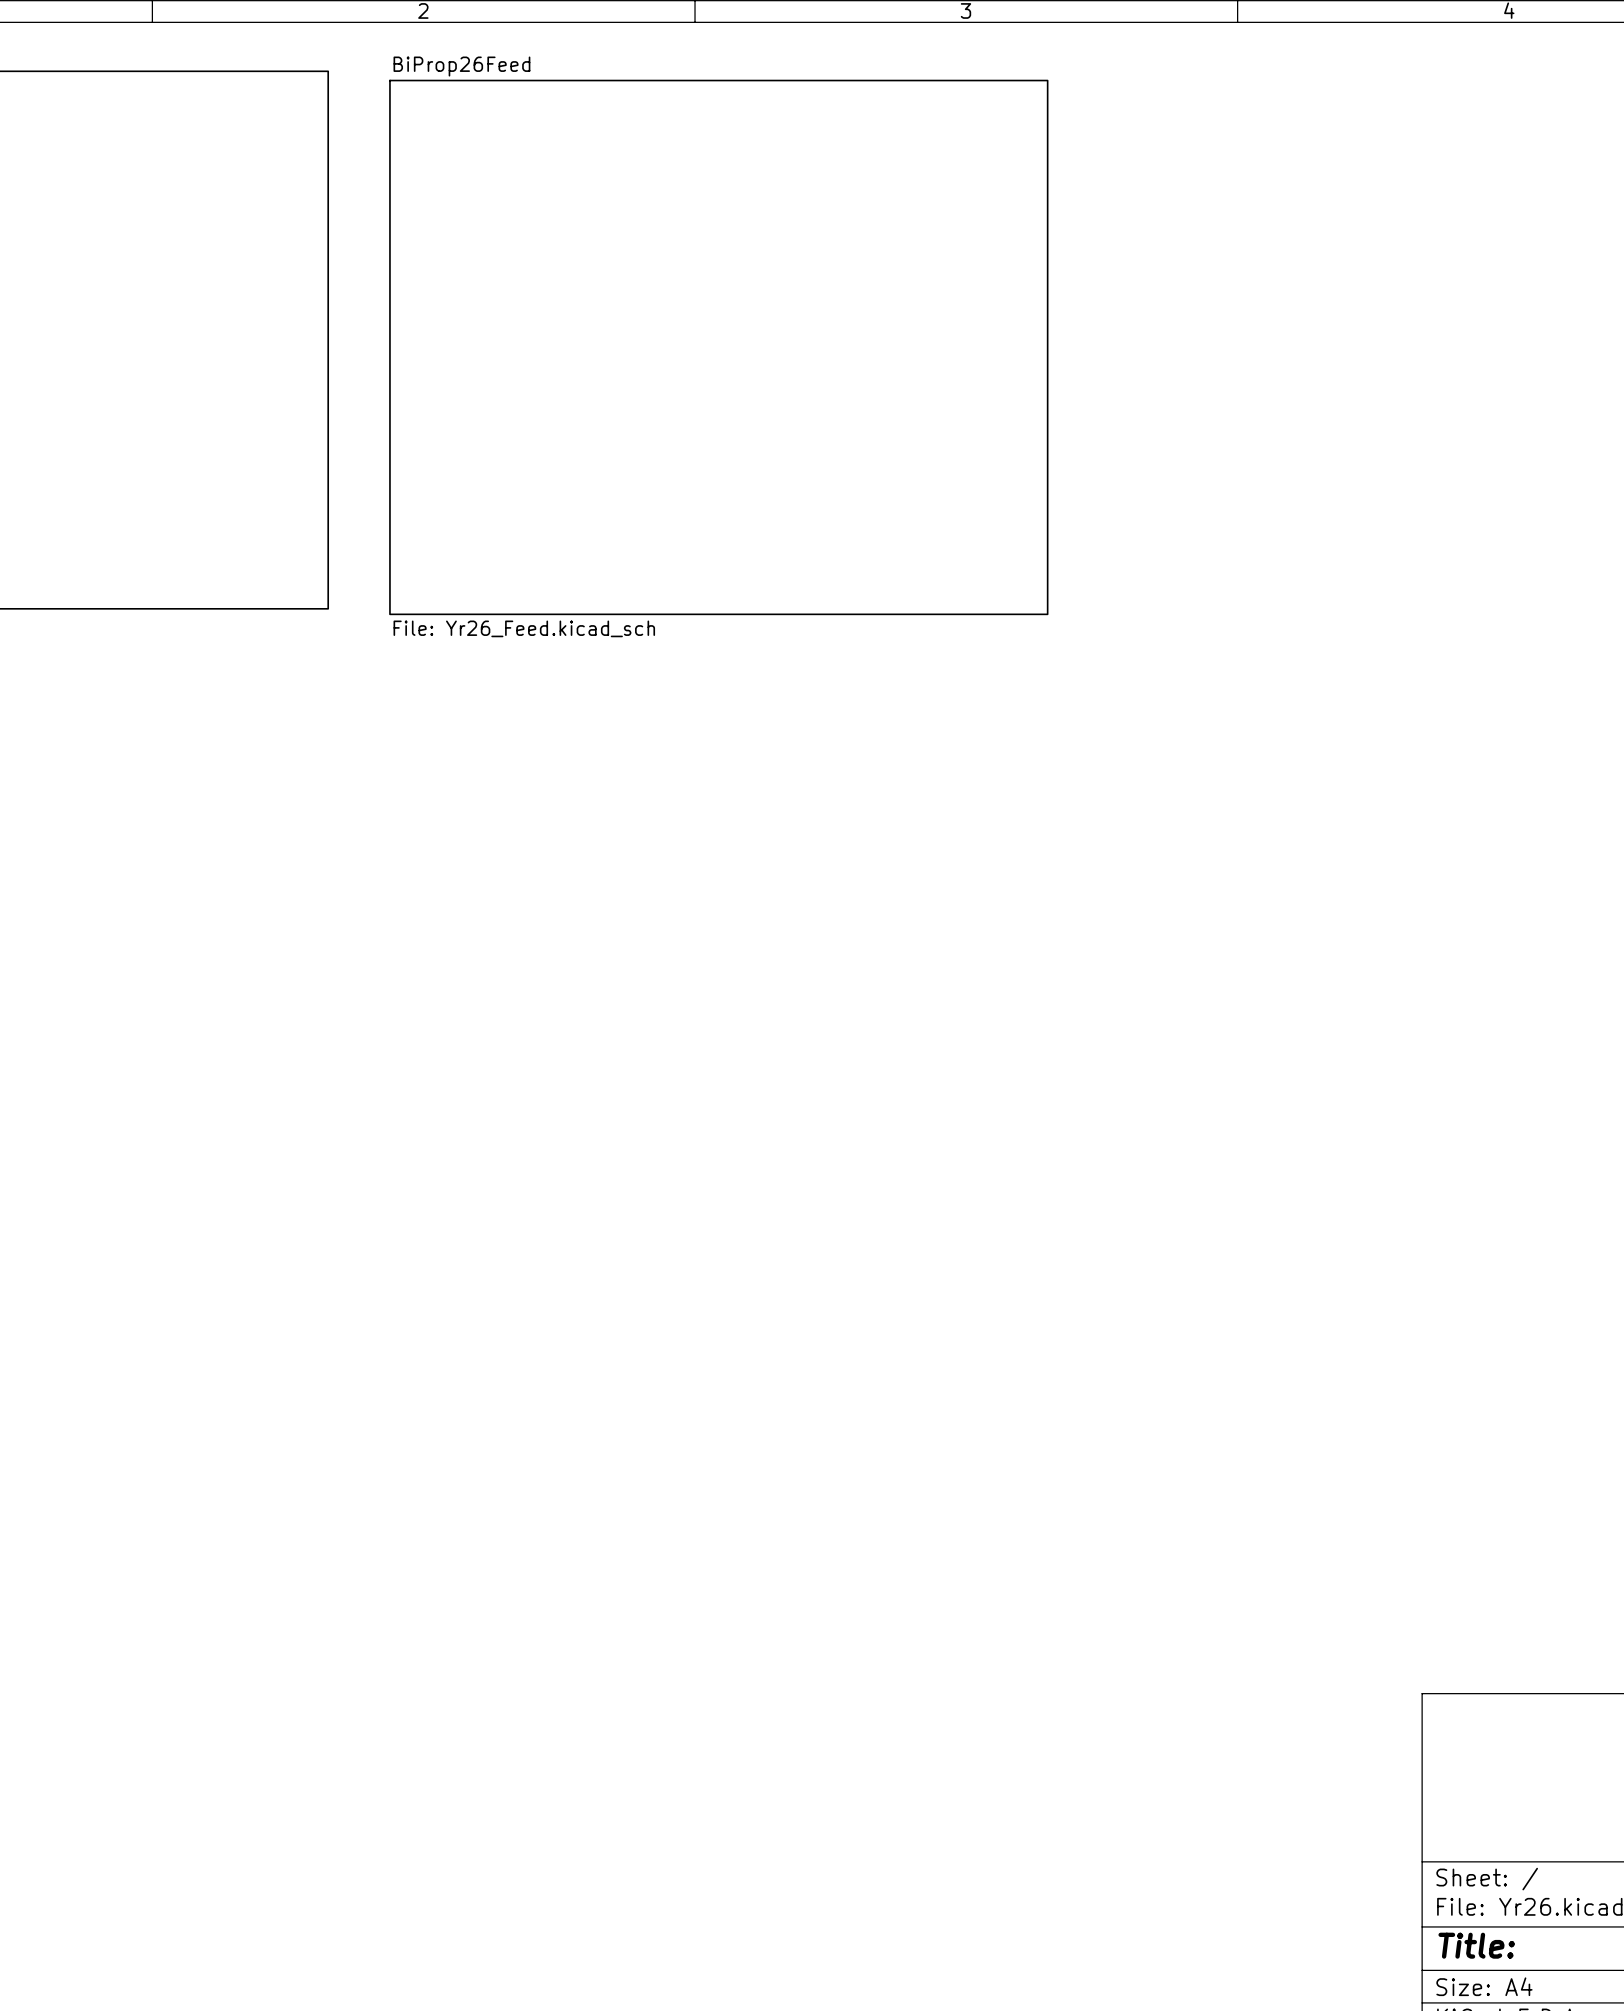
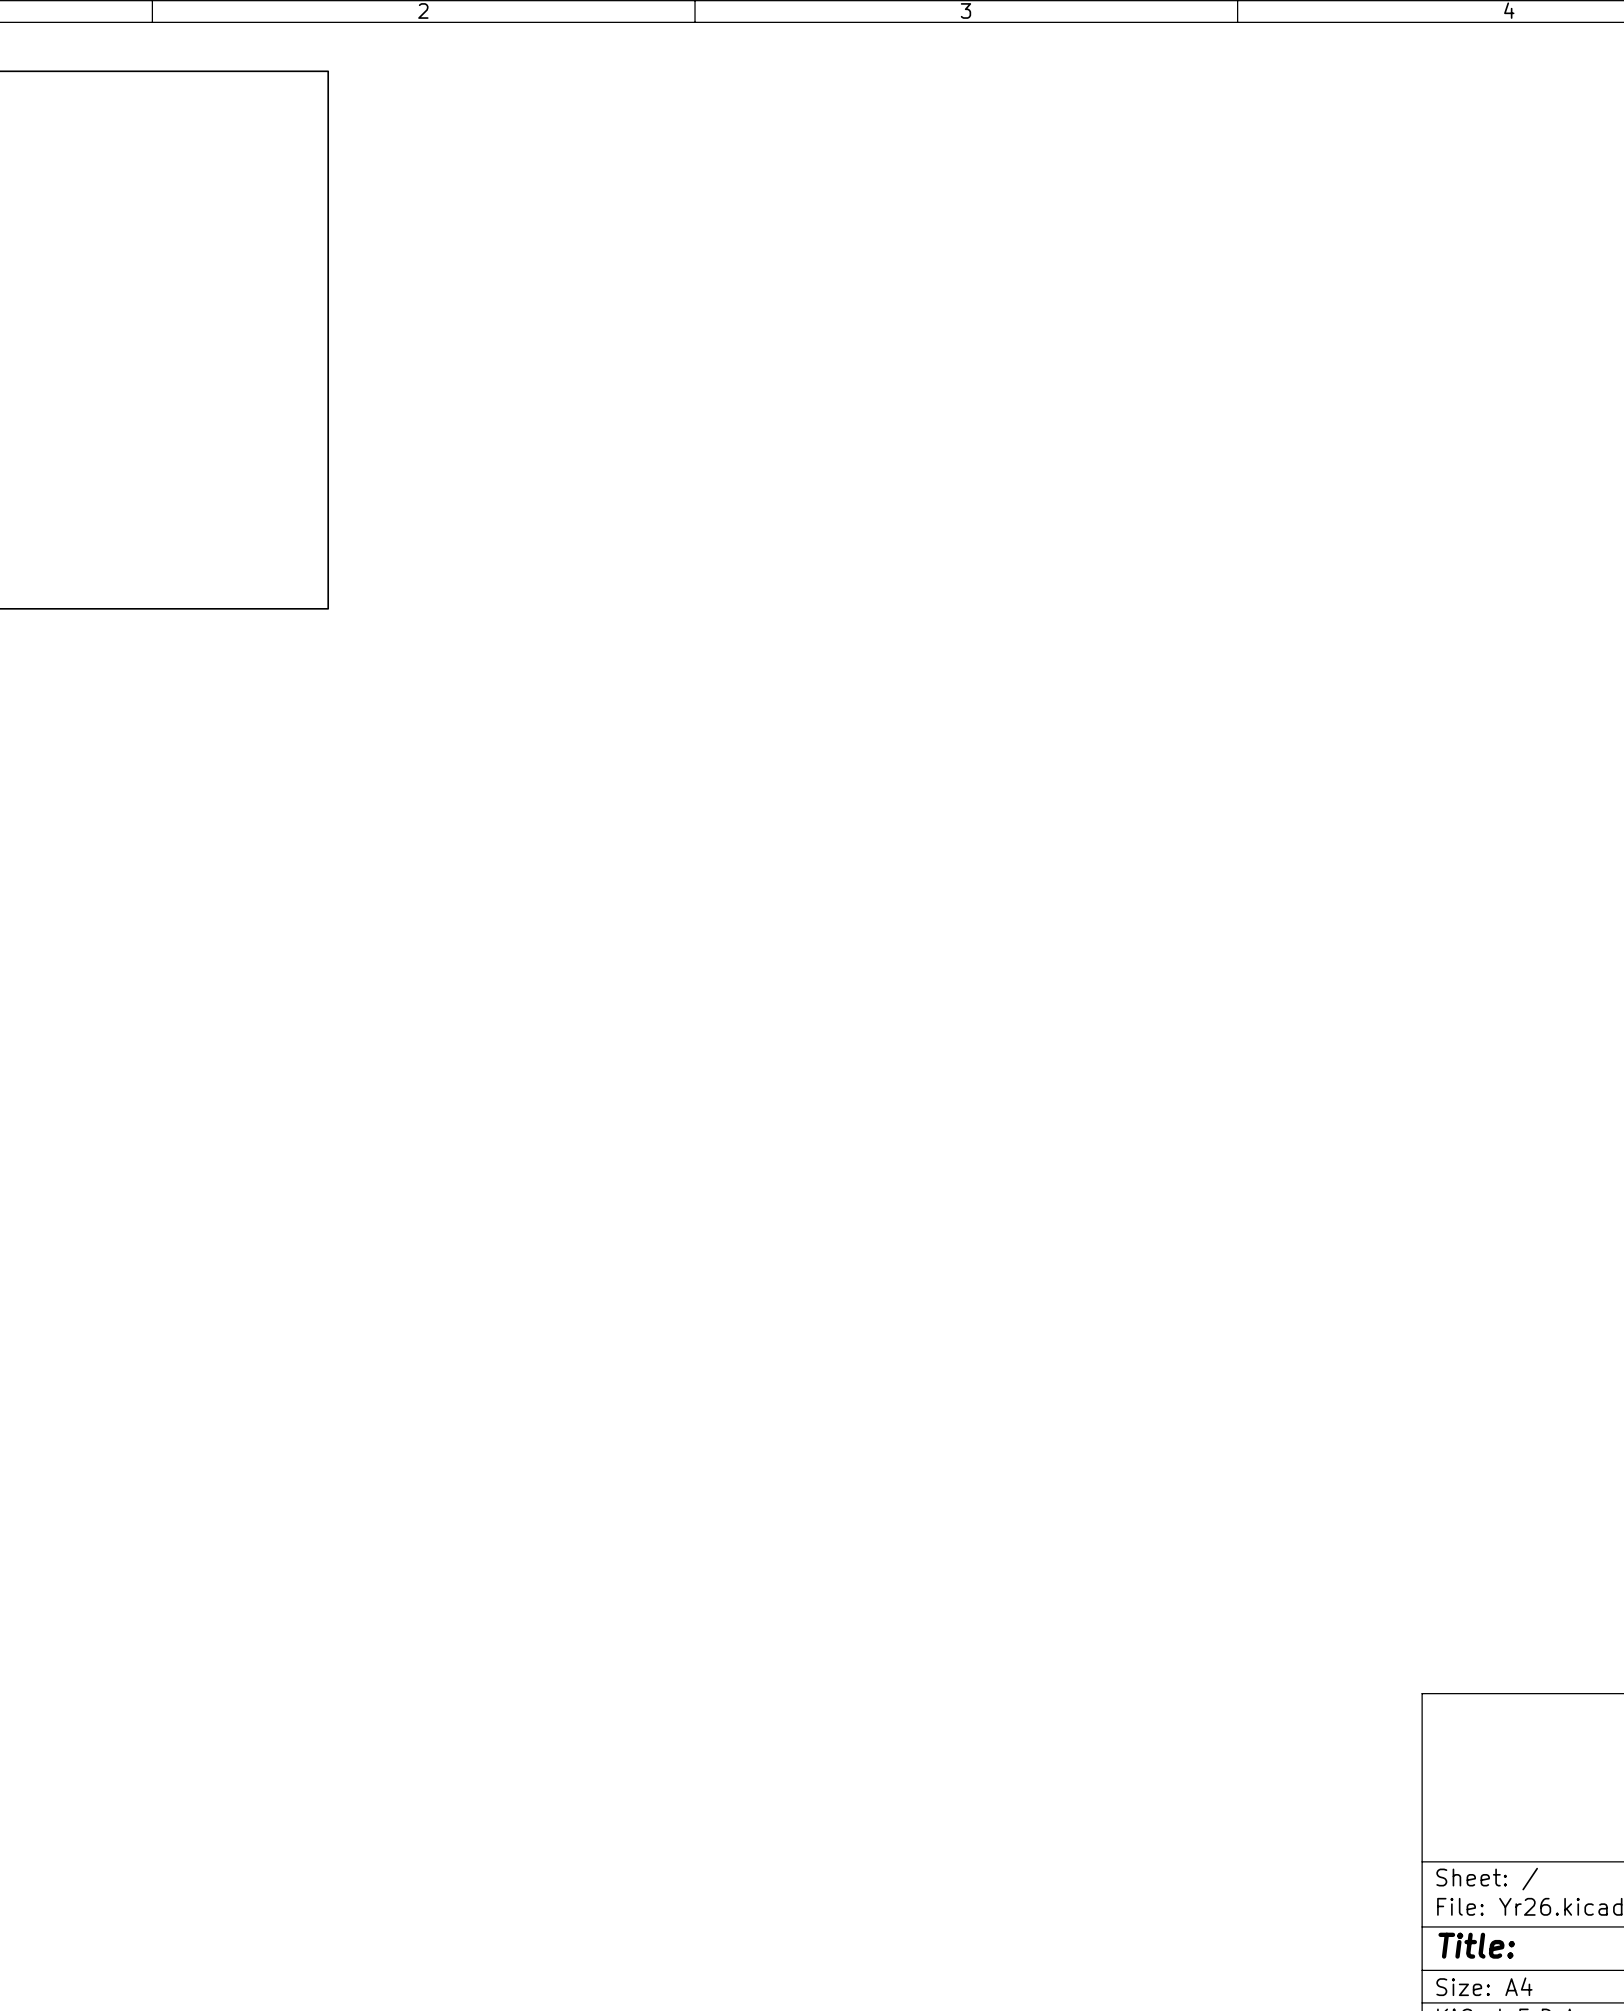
sheet BiProp26Feed: File: Yr26_Feed.kicad_sch (718, 347) -> none

